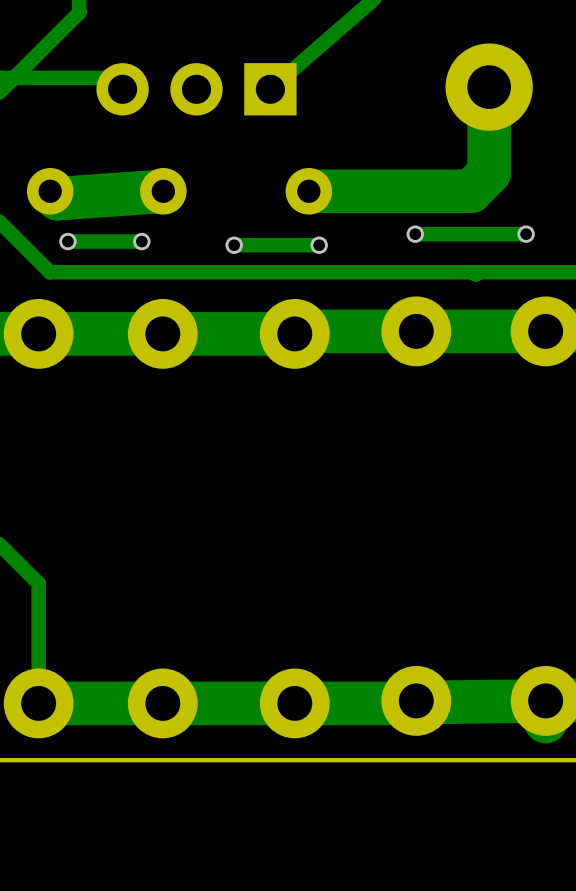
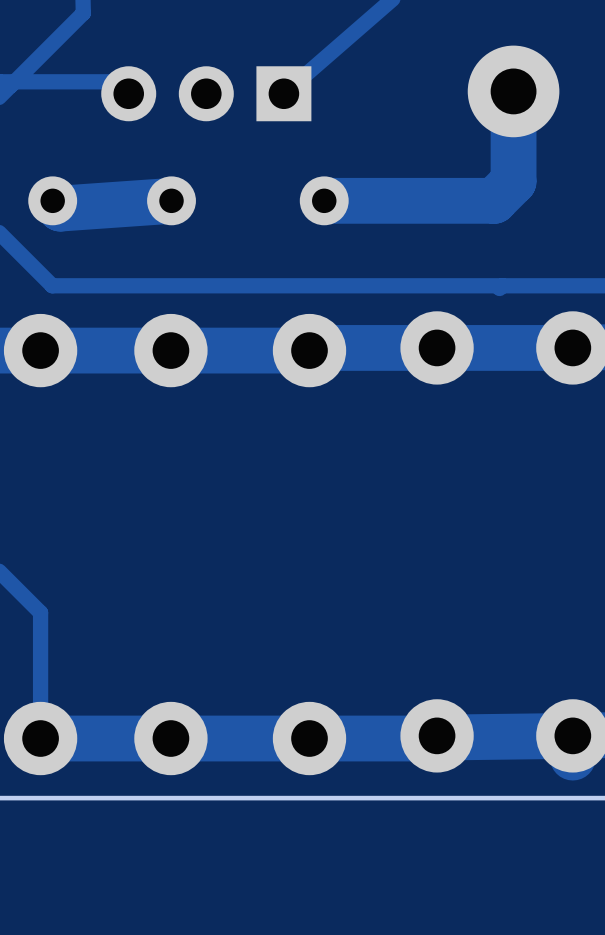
via: (415, 234) -> none
track: (526, 234) (415, 234) -> none
via: (526, 234) -> none
via: (67, 241) -> none
track: (141, 241) (67, 241) -> none
via: (141, 241) -> none
via: (234, 245) -> none
track: (319, 245) (234, 245) -> none
via: (319, 245) -> none

